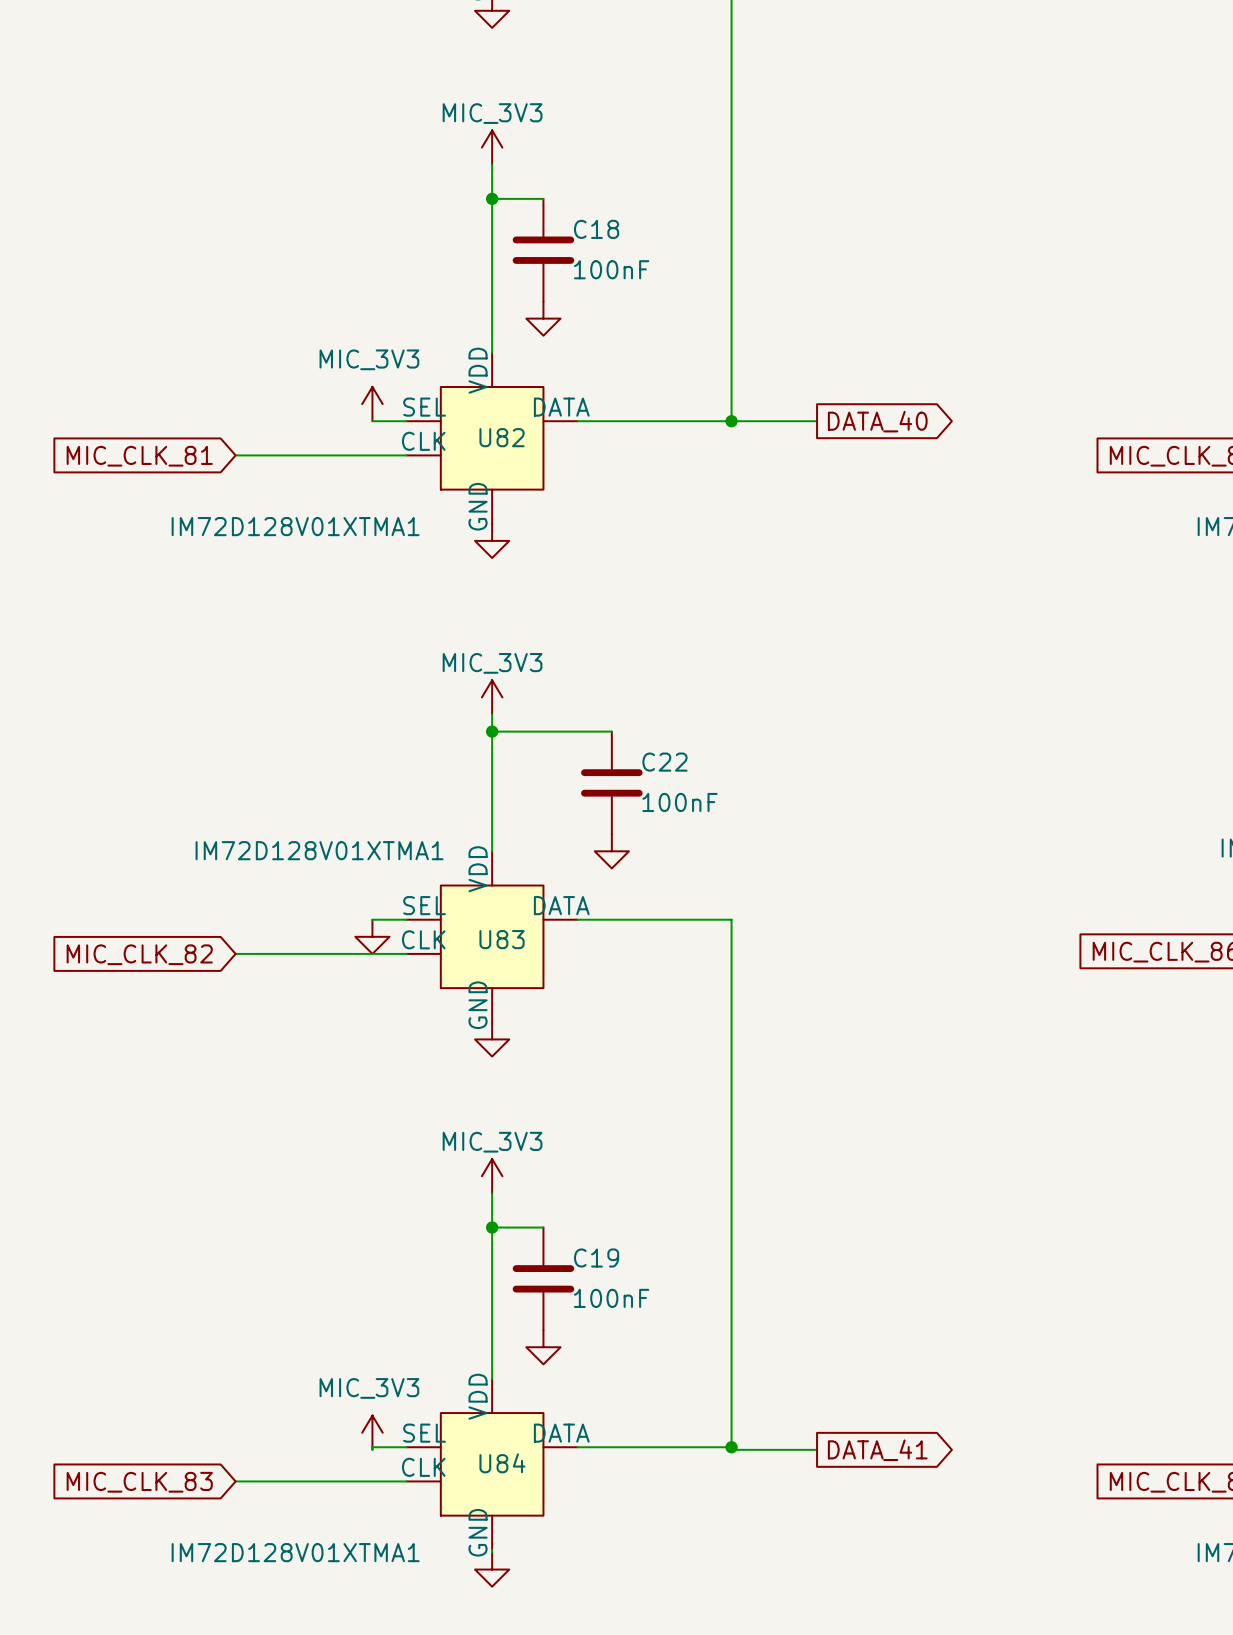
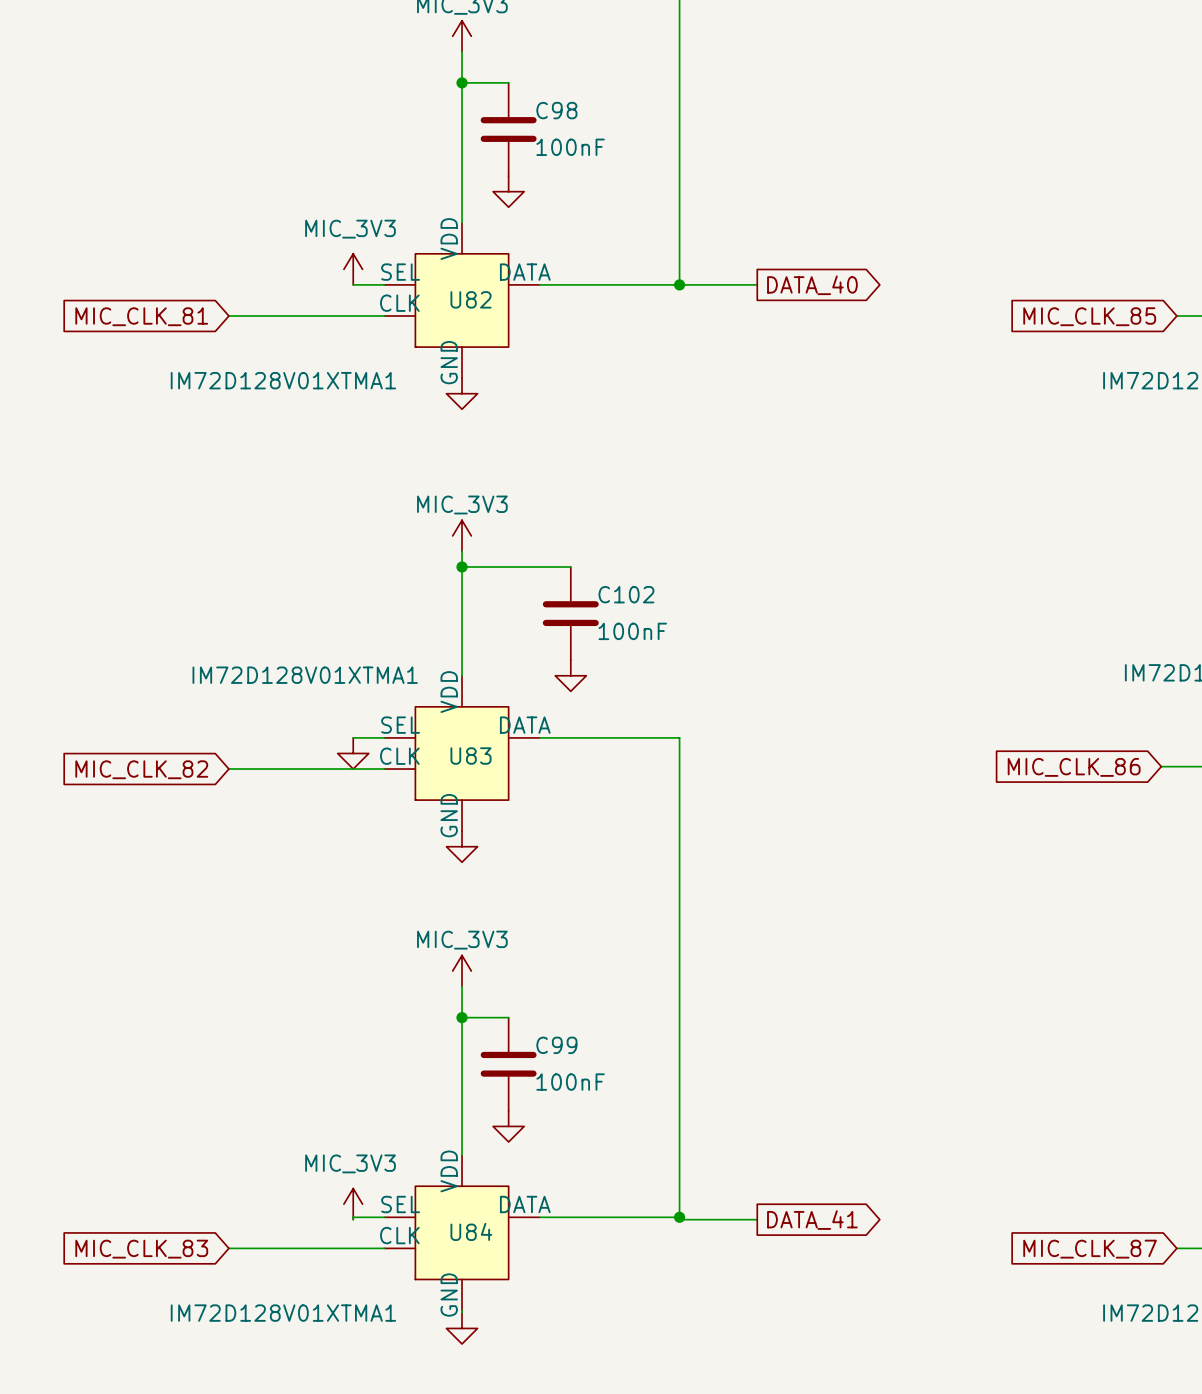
C18 name: C18 (596, 229) -> C98 (556, 110)
C22 name: C22 (664, 762) -> C102 (626, 594)
C19 name: C19 (596, 1258) -> C99 (556, 1045)

